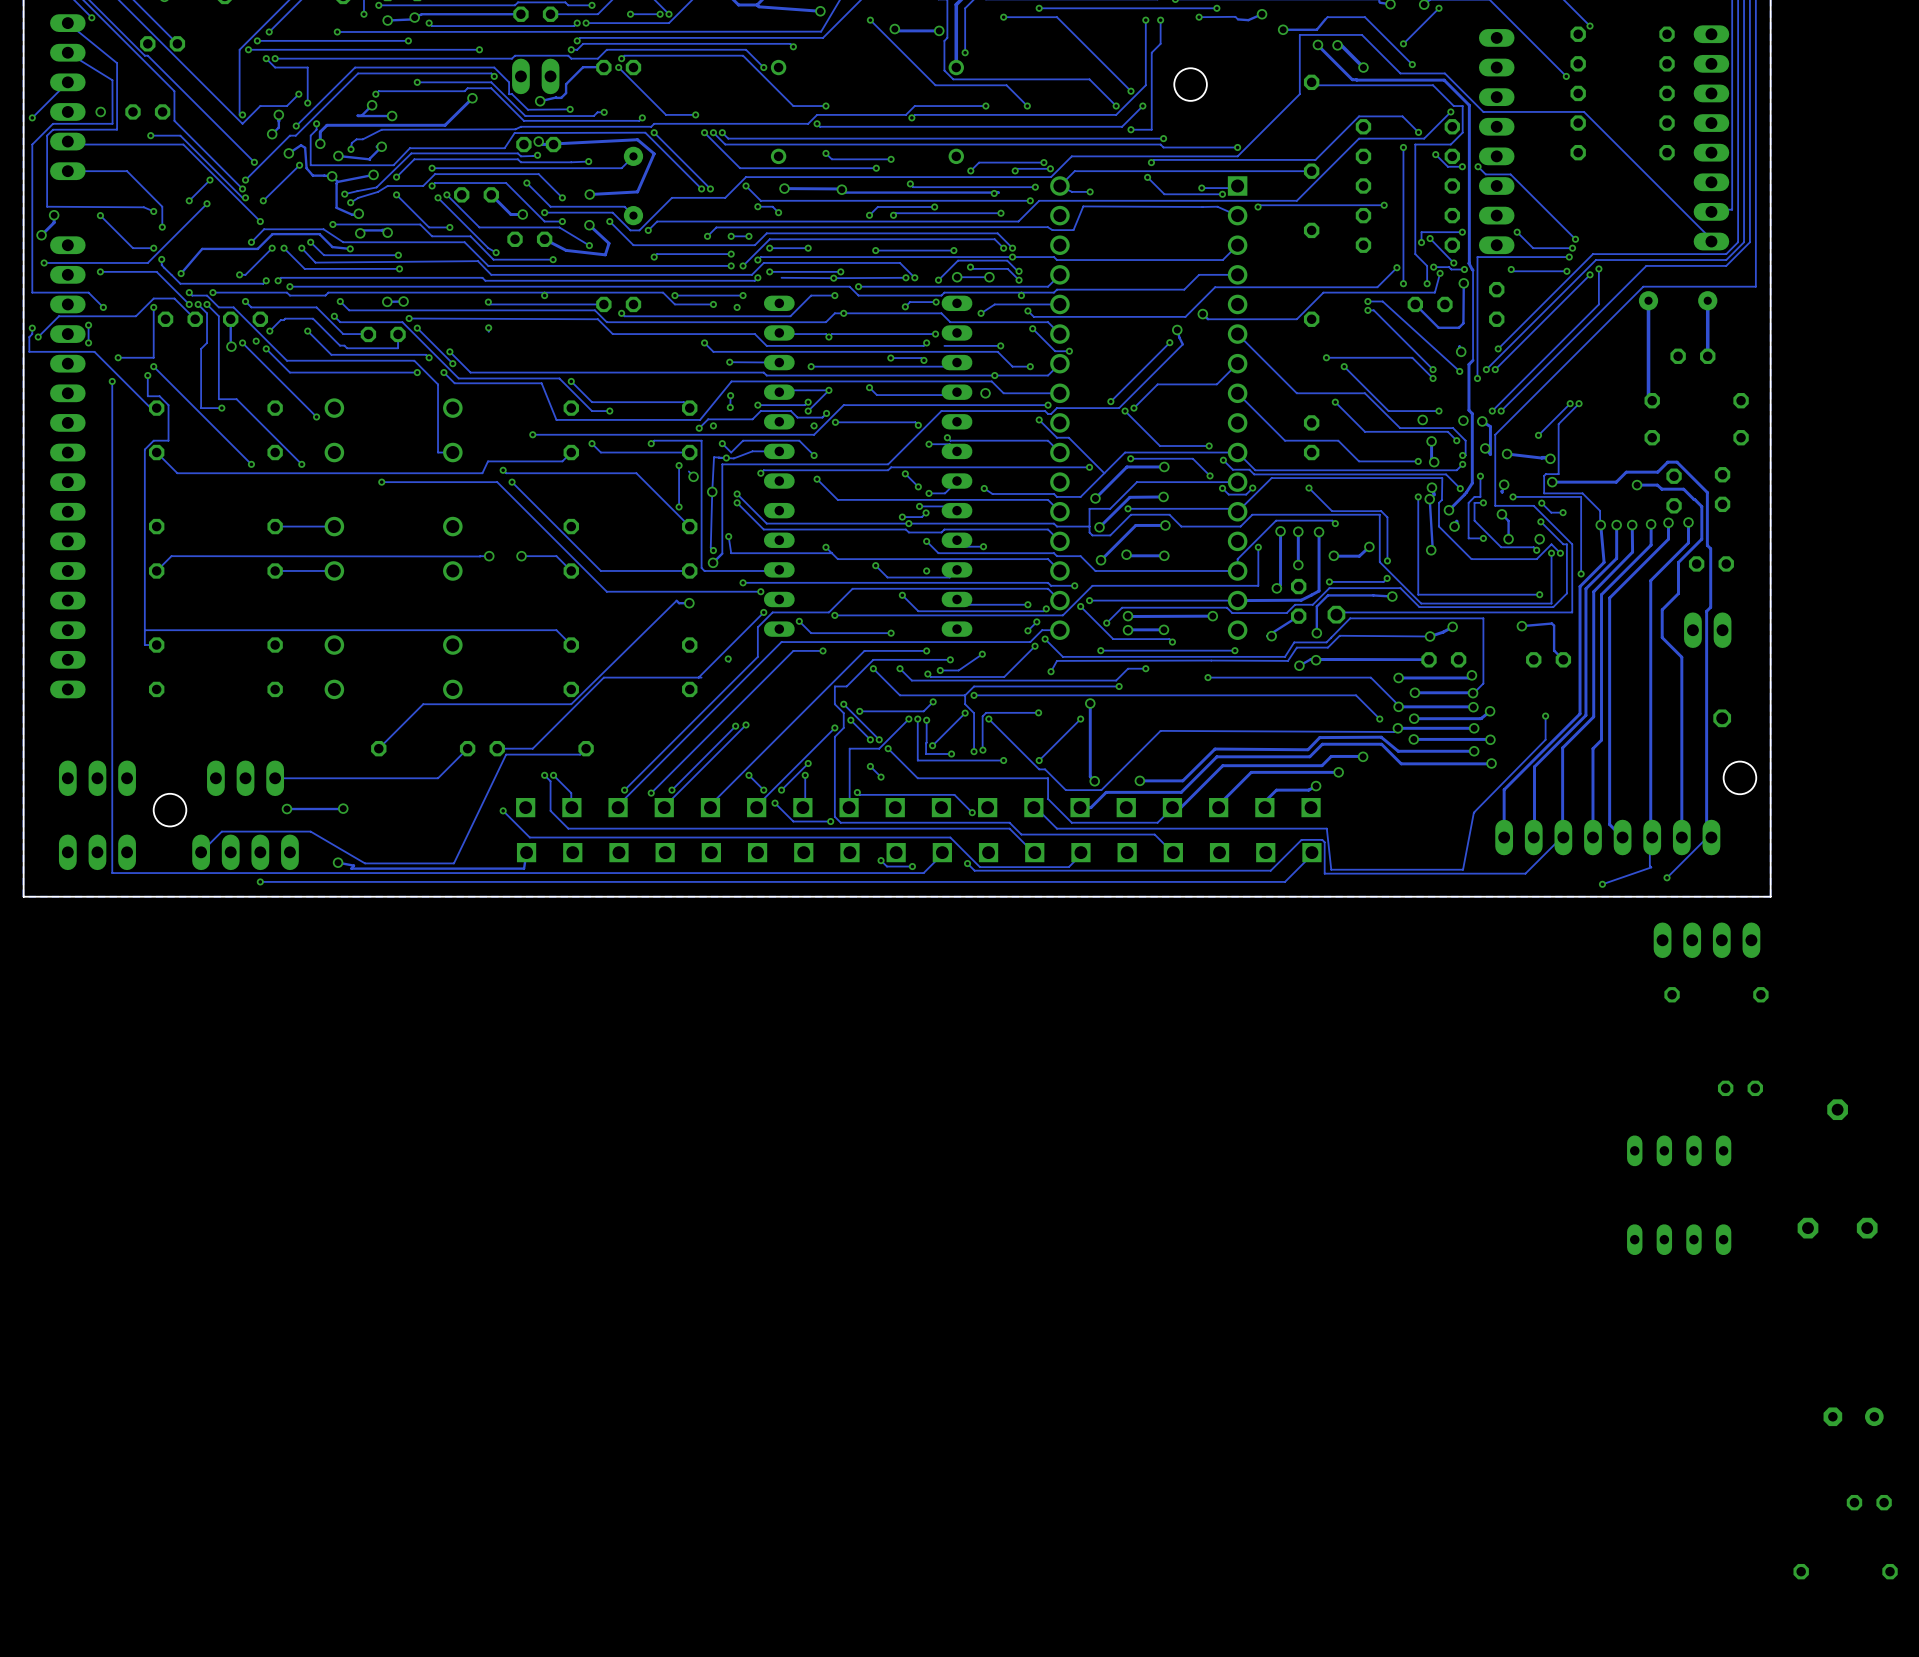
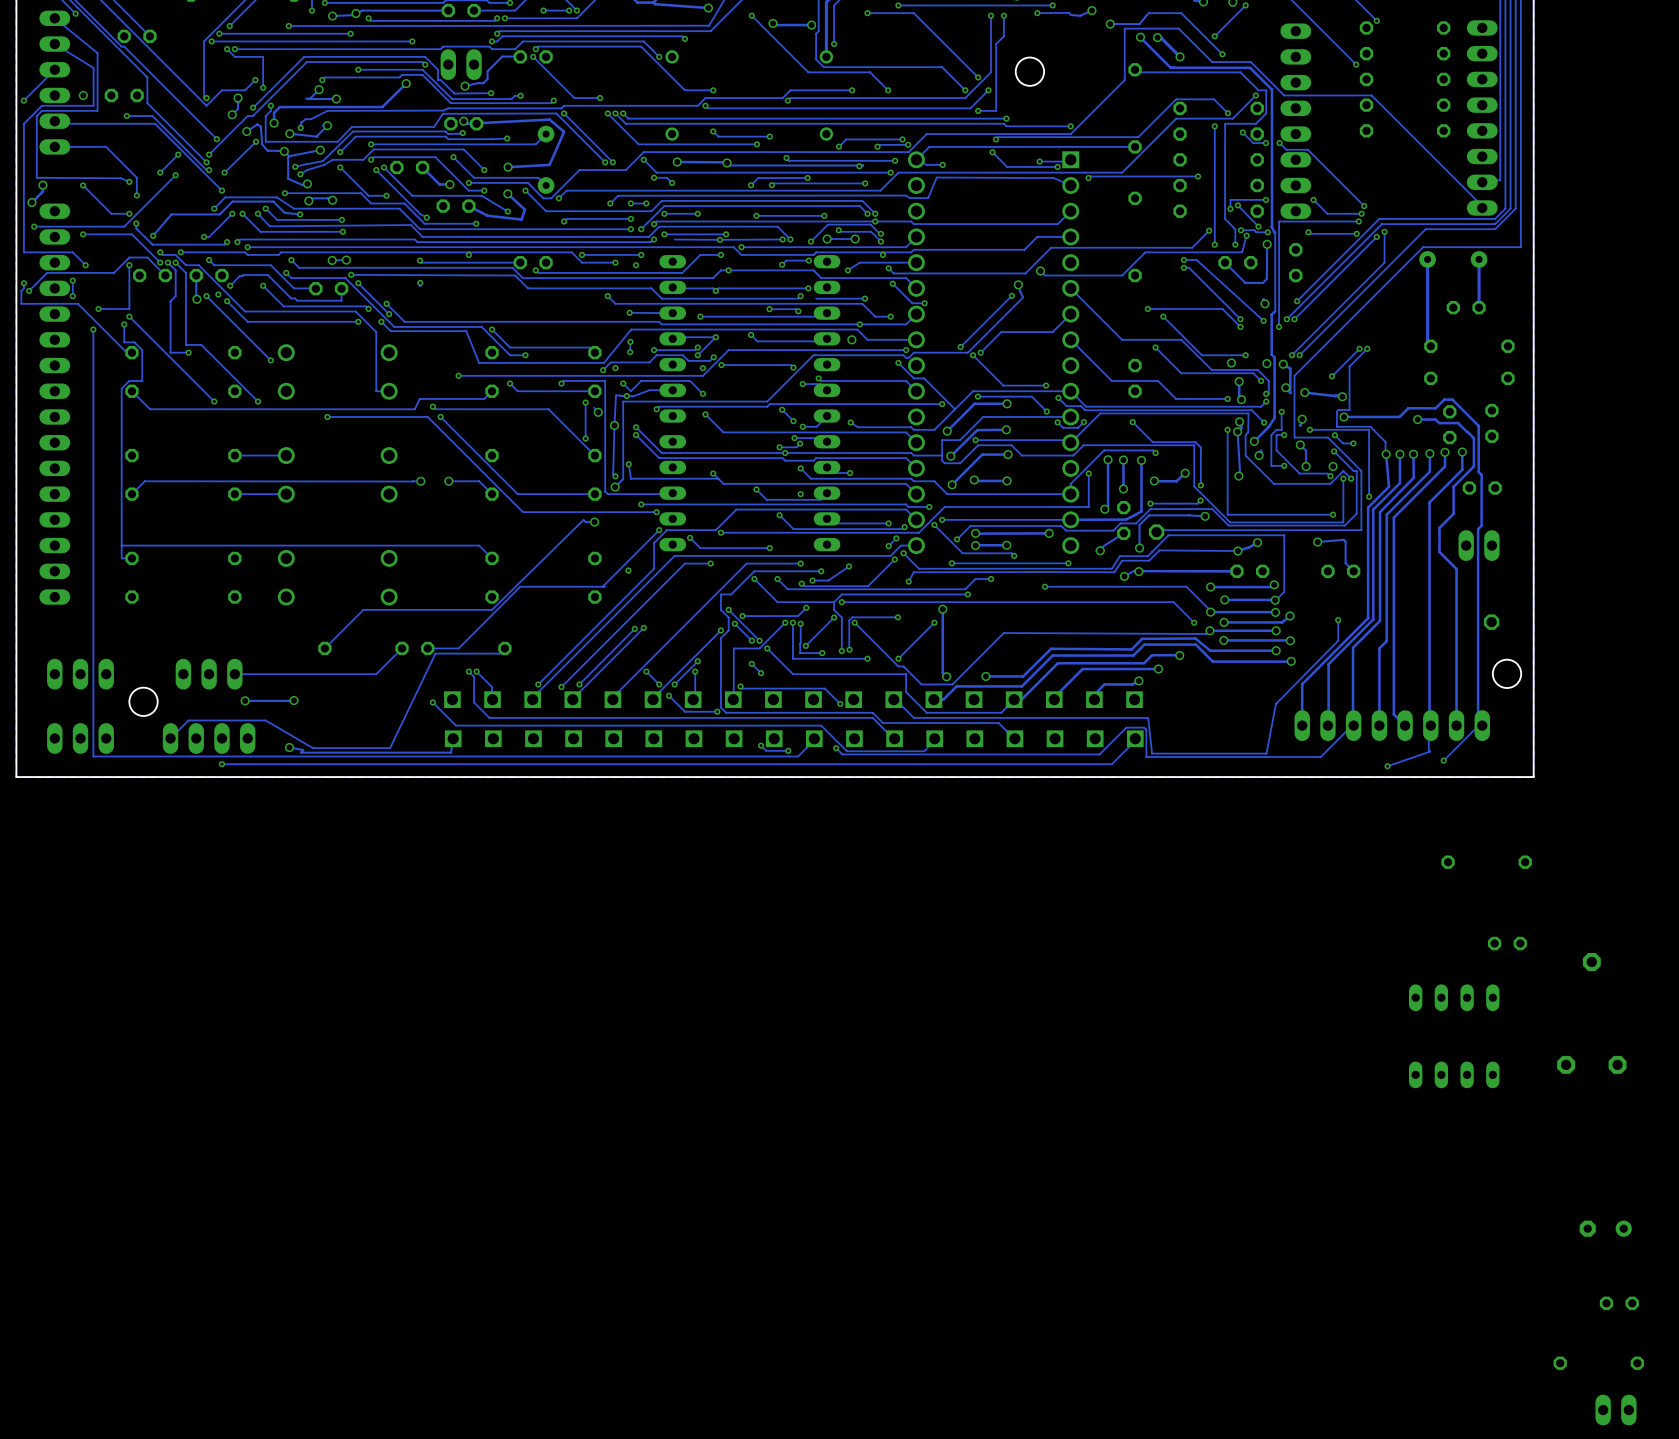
part: (1707, 940) -> none
part: none -> (1616, 1410)

